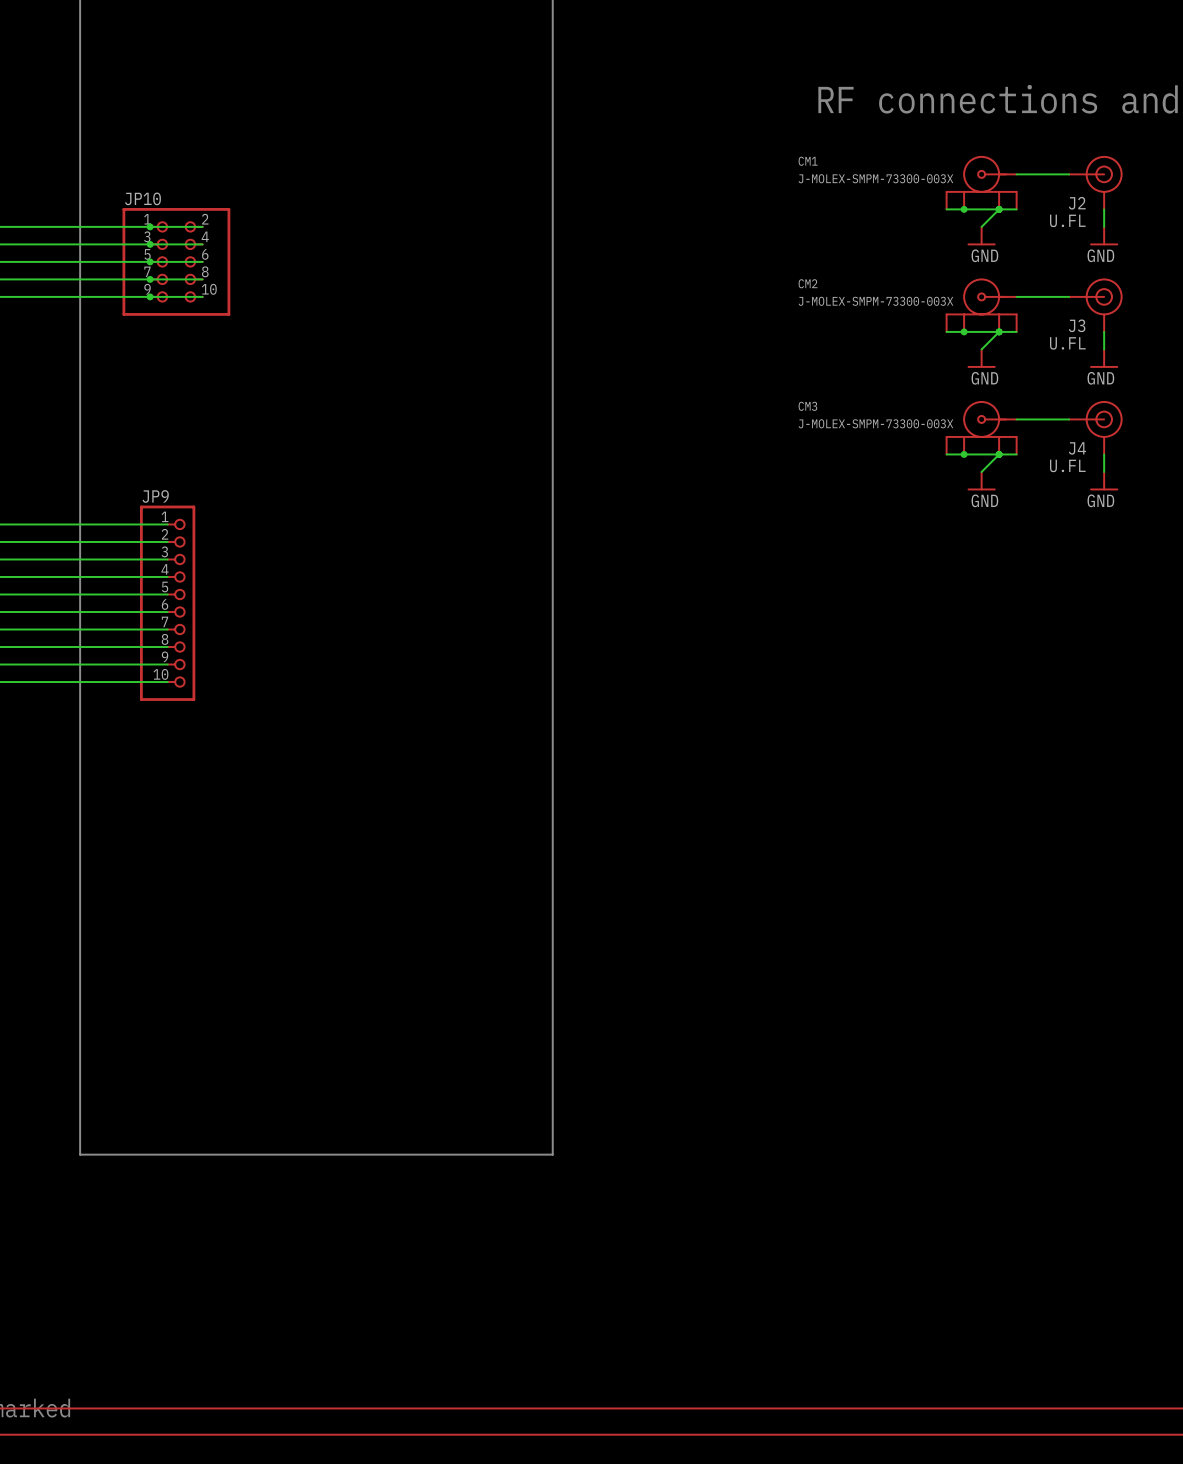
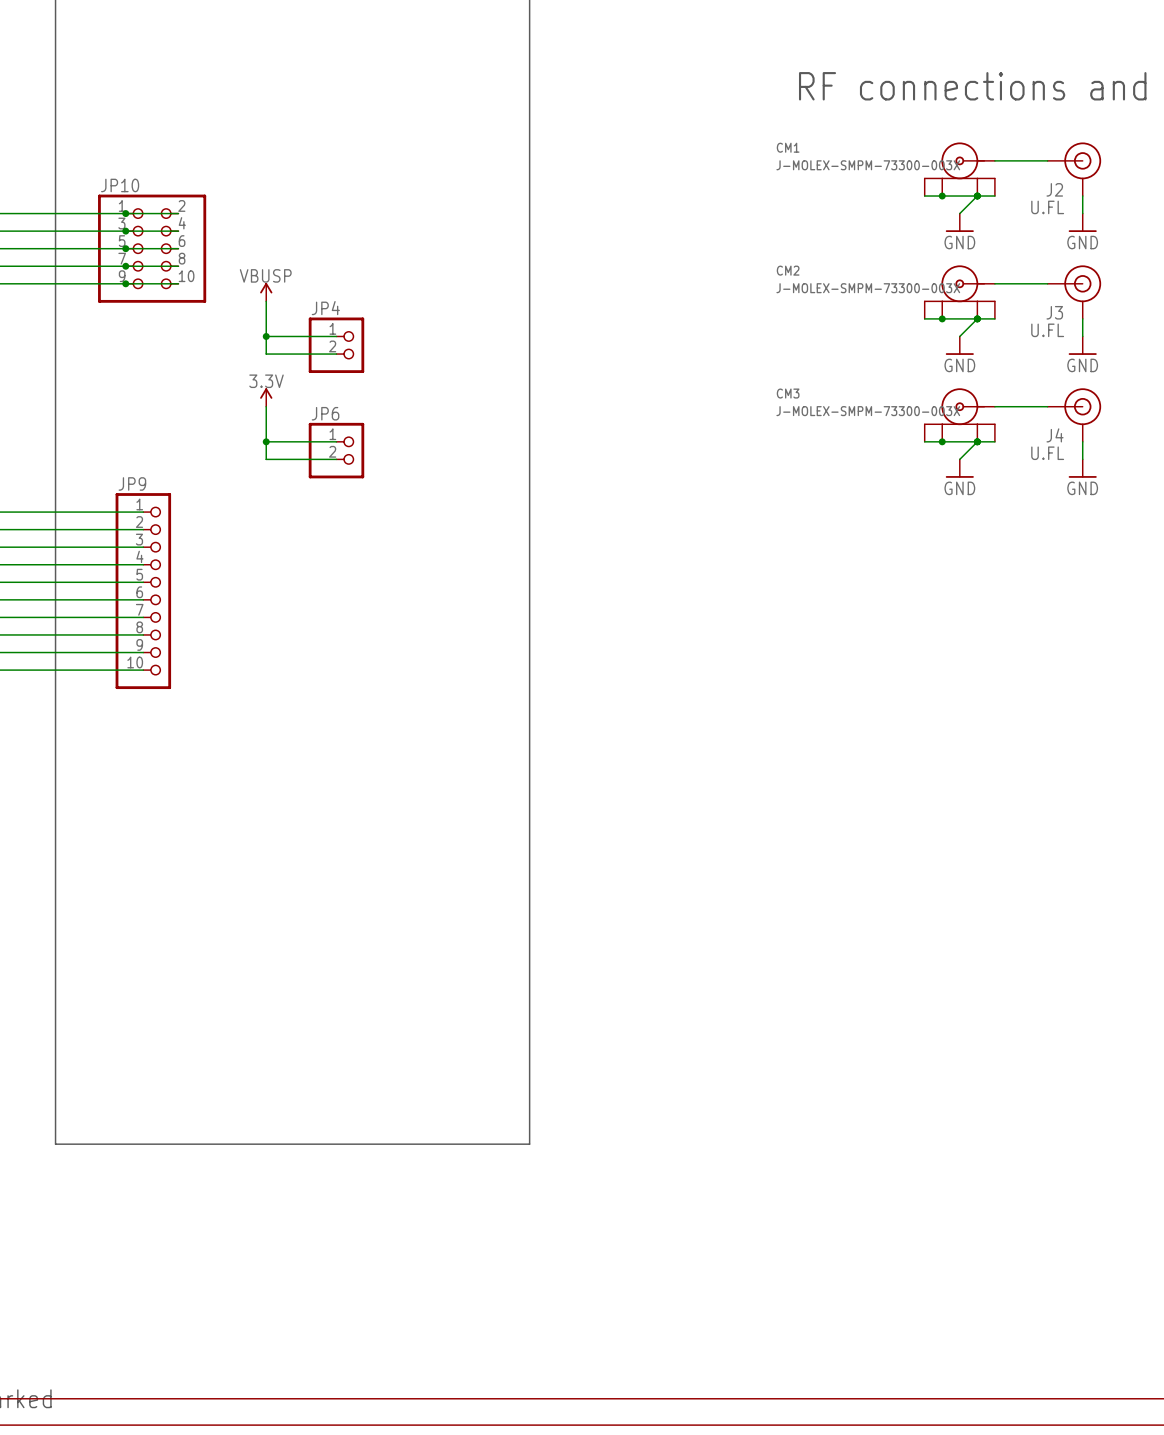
power symbol: none -> VBUSP (266, 292)
wire: none -> (266, 301) (266, 354) (336, 354)
wire: none -> (266, 336) (336, 336)
junction: none -> (266, 336)
JP4: none -> (336, 345)
power symbol: none -> 3.3V (266, 397)
wire: none -> (266, 406) (266, 459) (336, 459)
wire: none -> (266, 441) (336, 441)
junction: none -> (266, 441)
JP6: none -> (336, 450)

